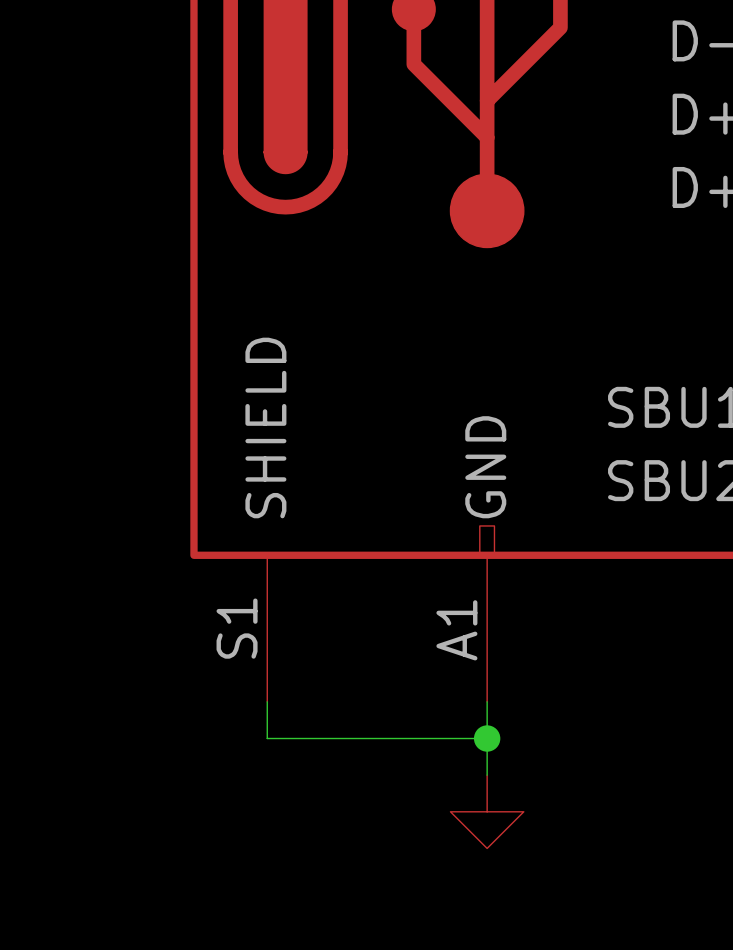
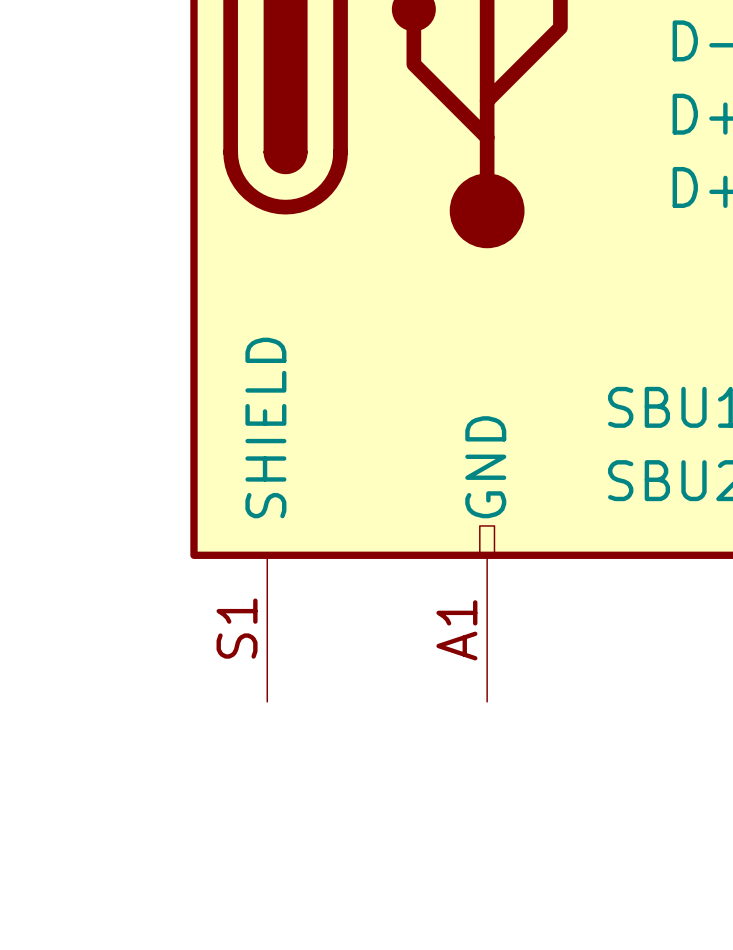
wire: (267, 701) (267, 738) (487, 738) -> none
wire: (487, 701) (487, 775) -> none
junction: (487, 738) -> none
power symbol: (487, 811) -> none

